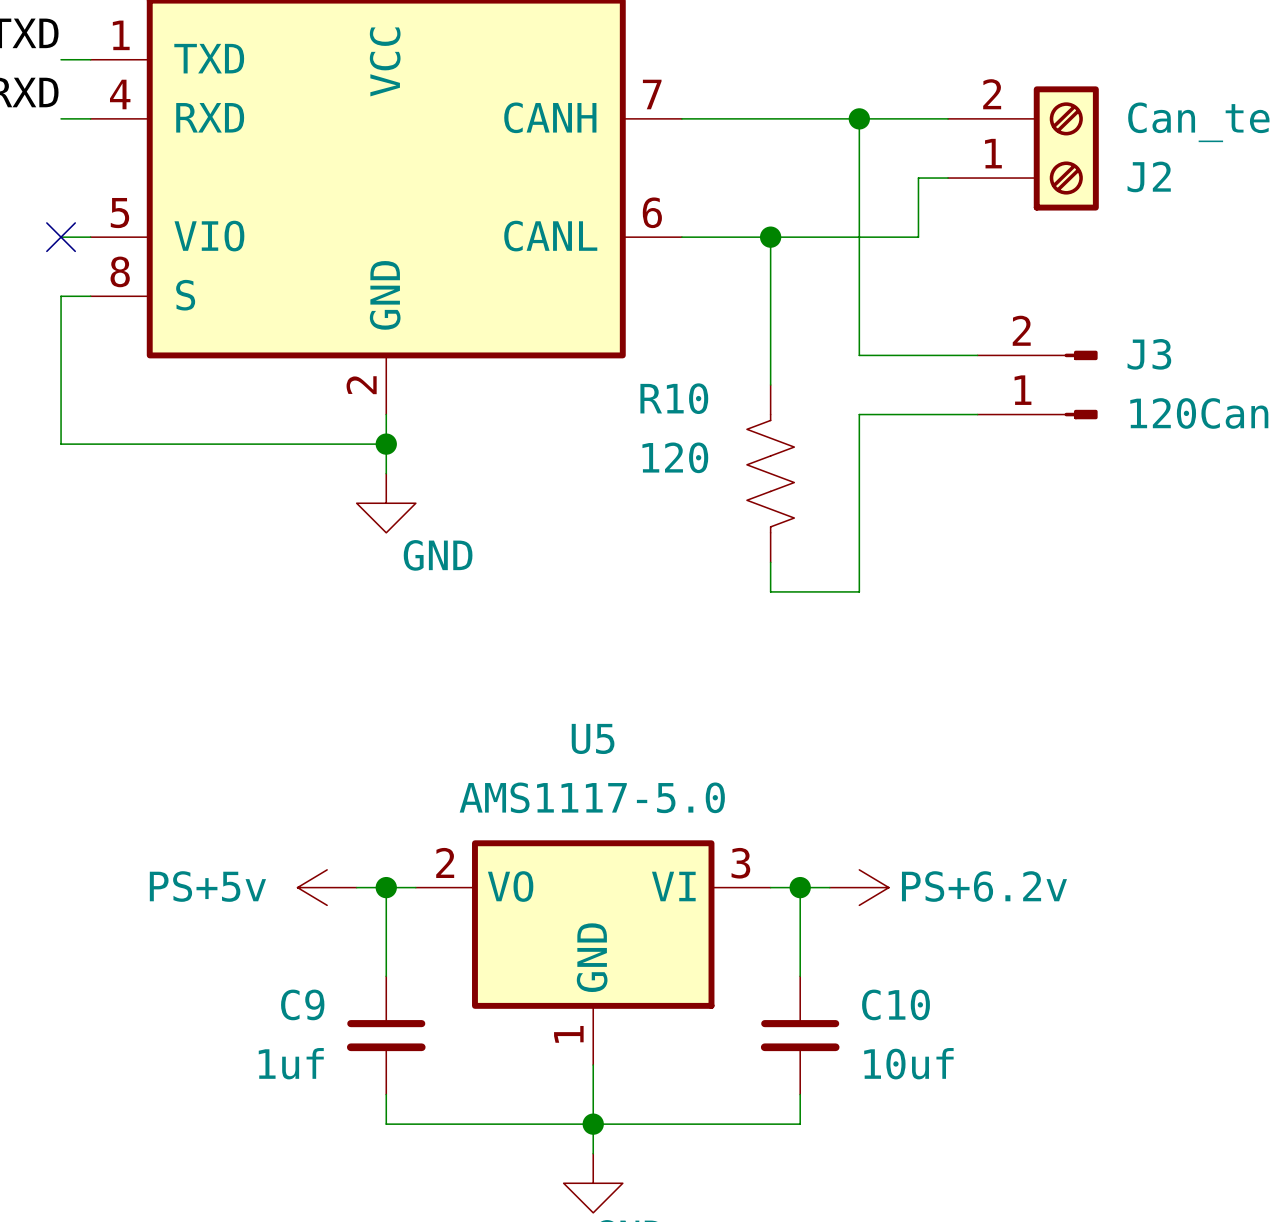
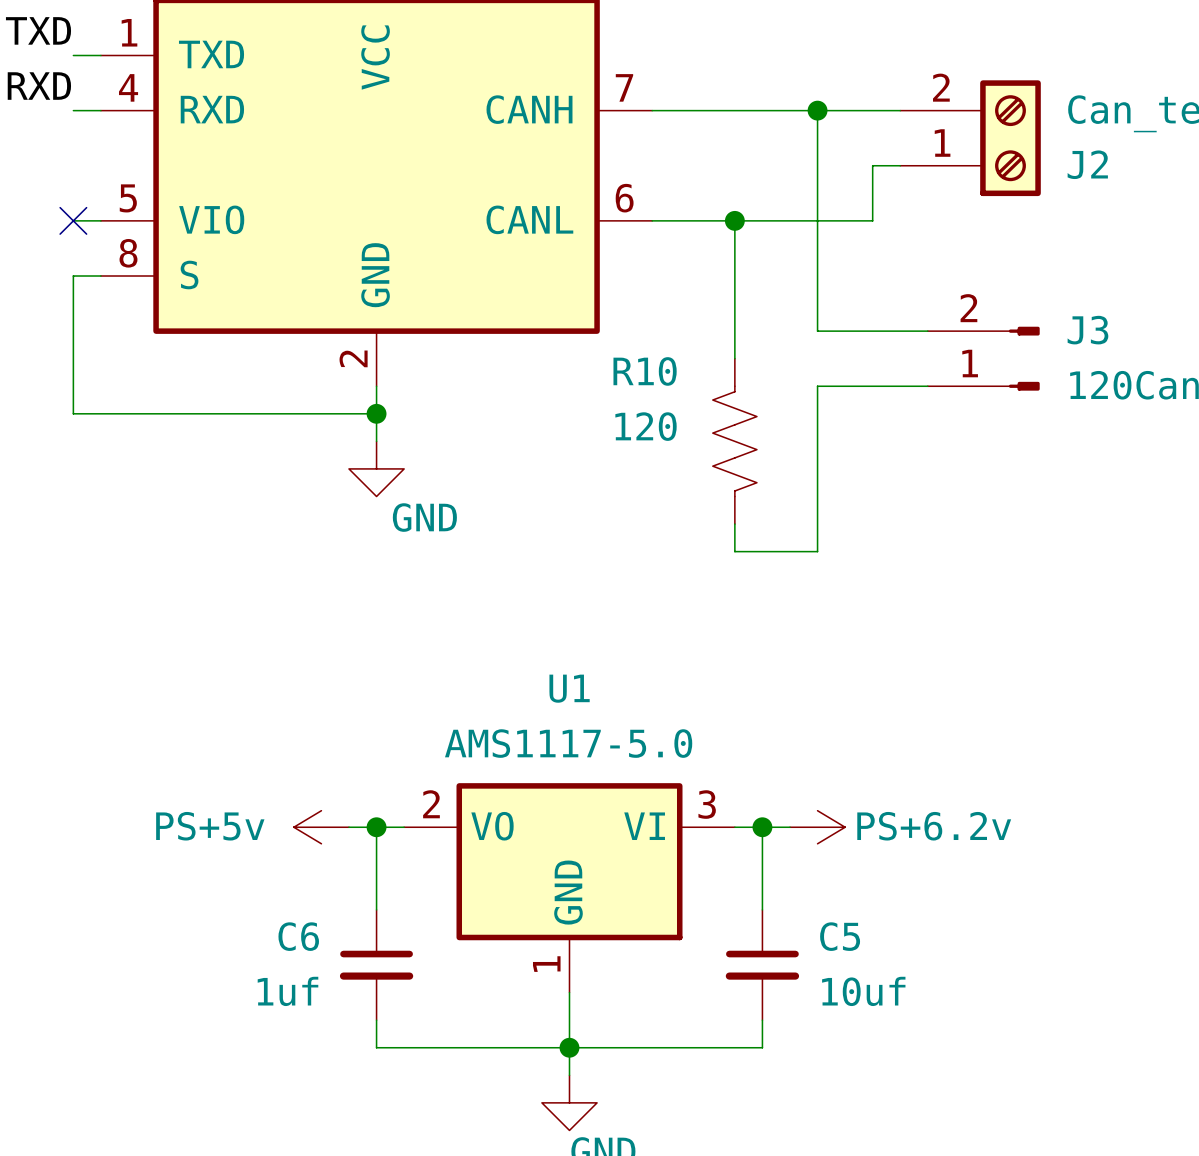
U5 name: U5 (593, 738) -> U1 (569, 688)
C9 name: C9 (302, 1004) -> C6 (298, 936)
C10 name: C10 (896, 1004) -> C5 (840, 936)

